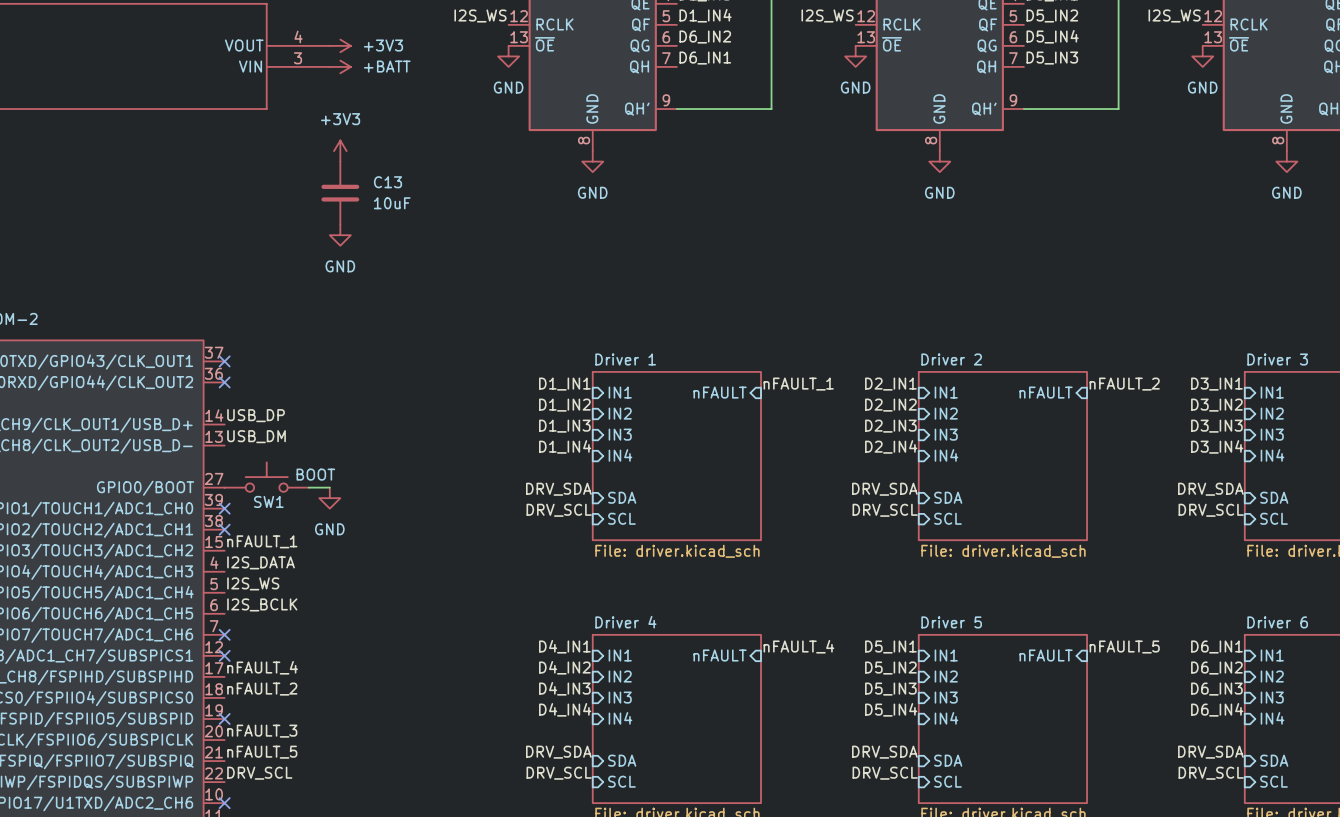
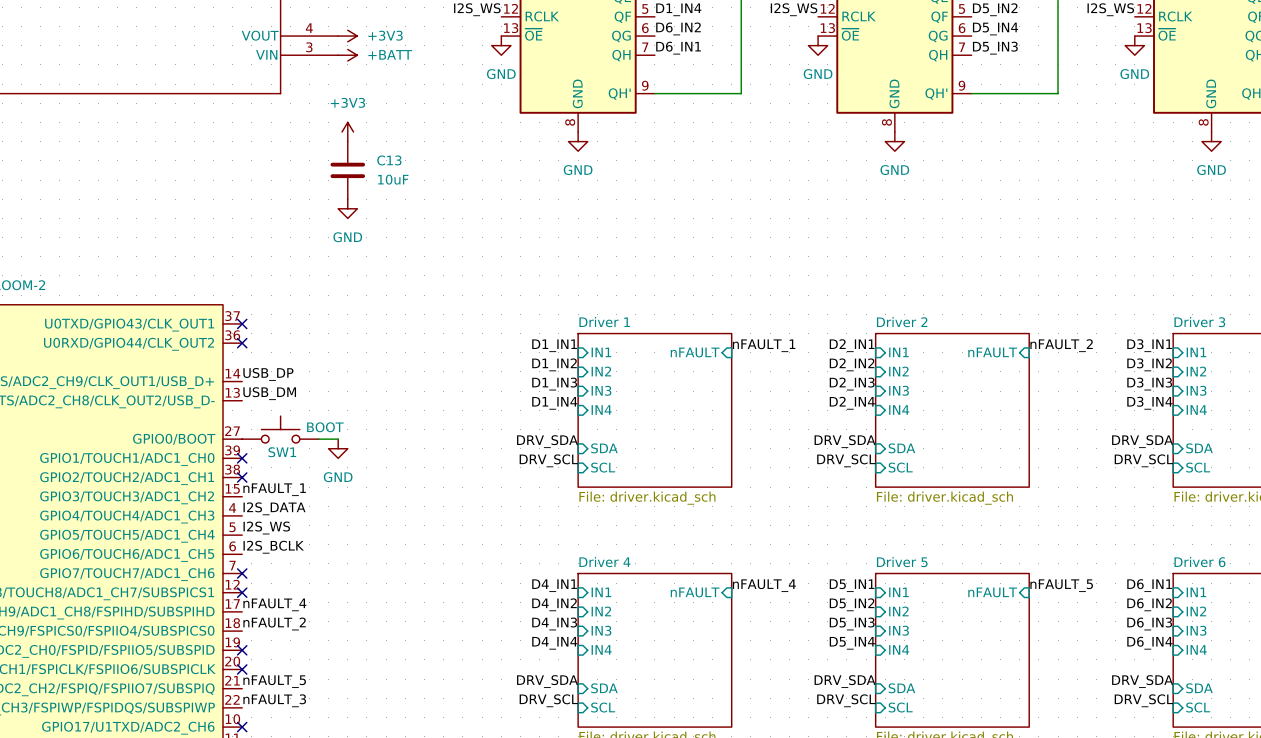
label: nFAULT_3 (262, 731) -> none
no-connect mark: none -> (242, 669)
label: DRV_SCL (259, 773) -> nFAULT_3 (274, 700)

